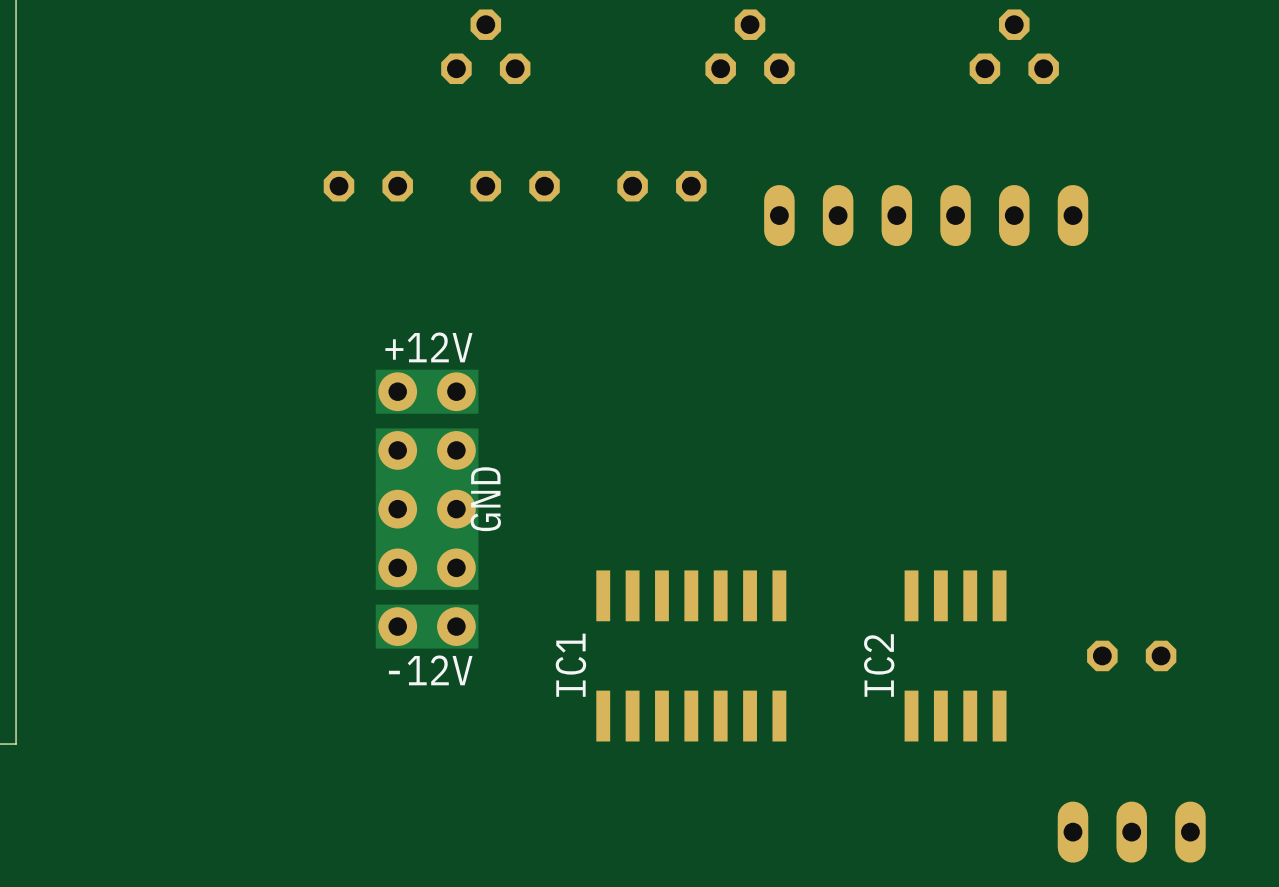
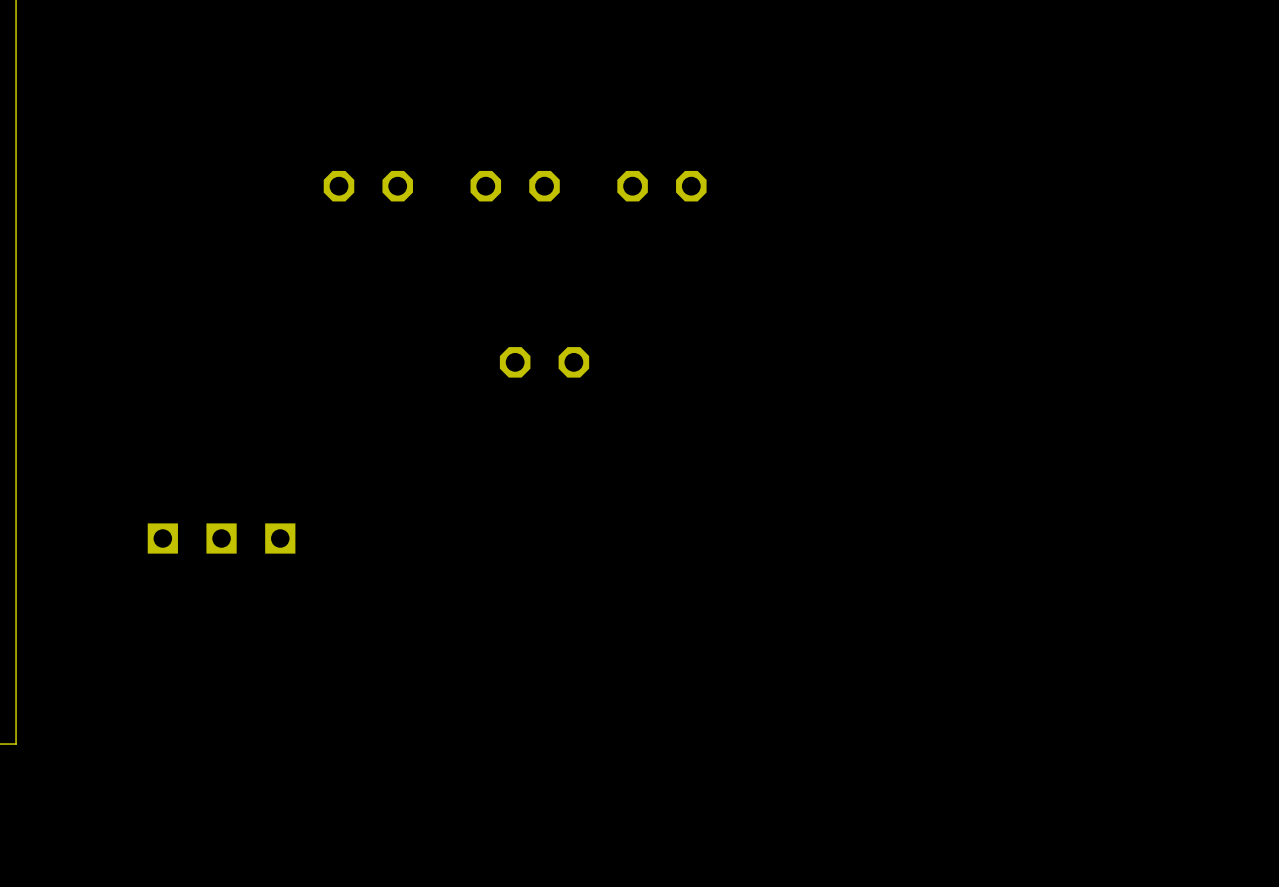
part: (485, 46) -> none
part: (750, 46) -> none
part: (1014, 46) -> none
part: (838, 215) -> none
part: (1014, 215) -> none
part: none -> (544, 362)
part: (427, 509) -> none
part: none -> (221, 538)
IC1: (691, 655) -> none
IC2: (955, 655) -> none
part: (1131, 655) -> none
part: (1131, 832) -> none

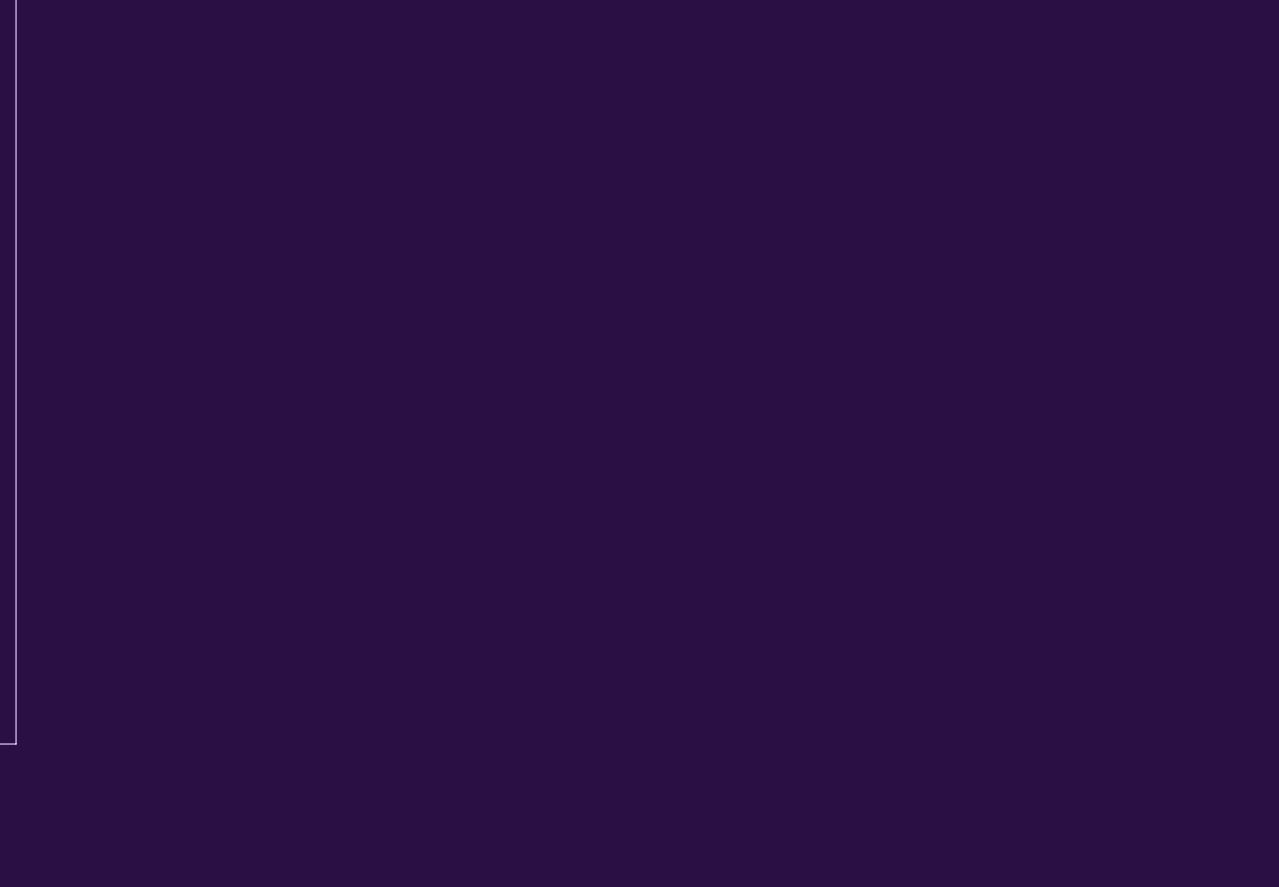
part: (368, 186) -> none
part: (515, 186) -> none
part: (661, 186) -> none
part: (544, 362) -> none
part: (221, 538) -> none

